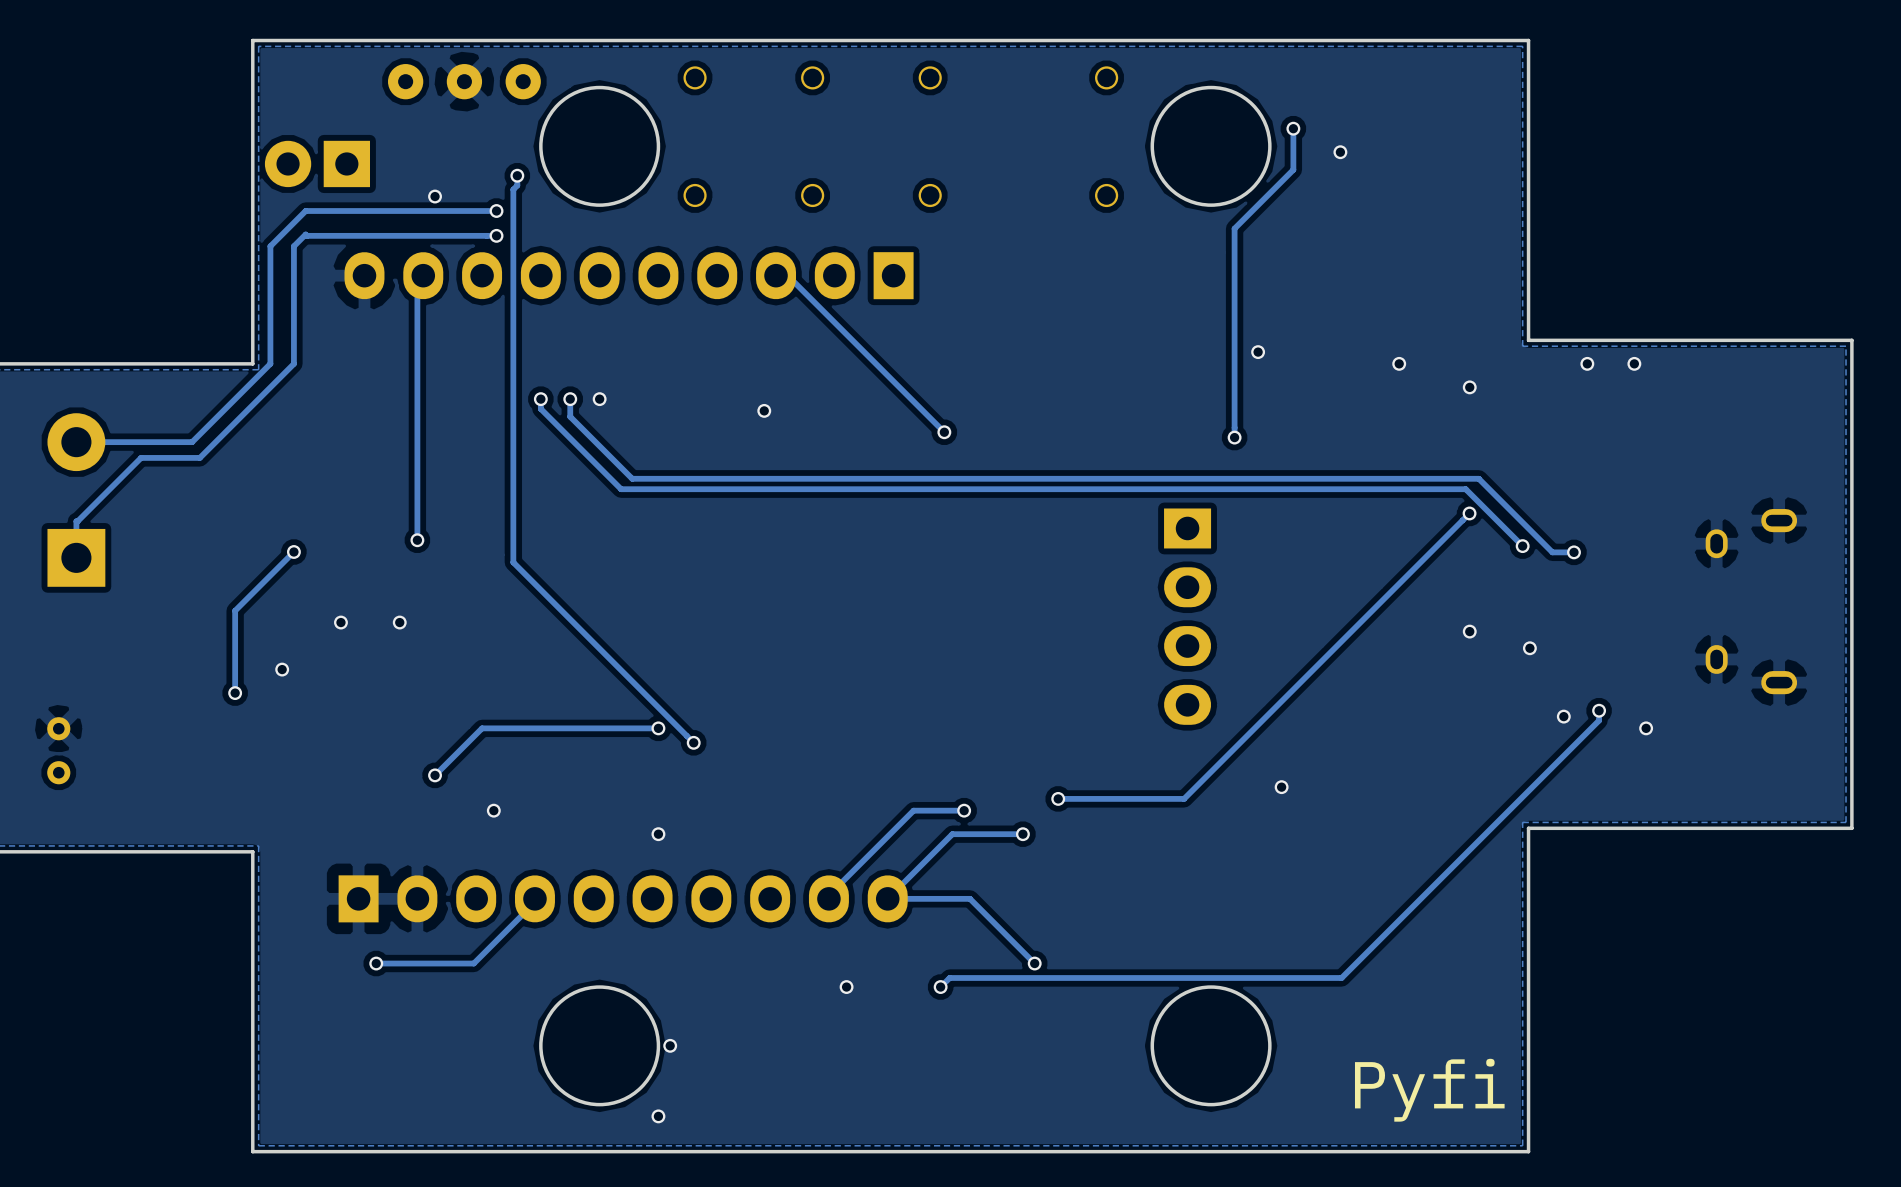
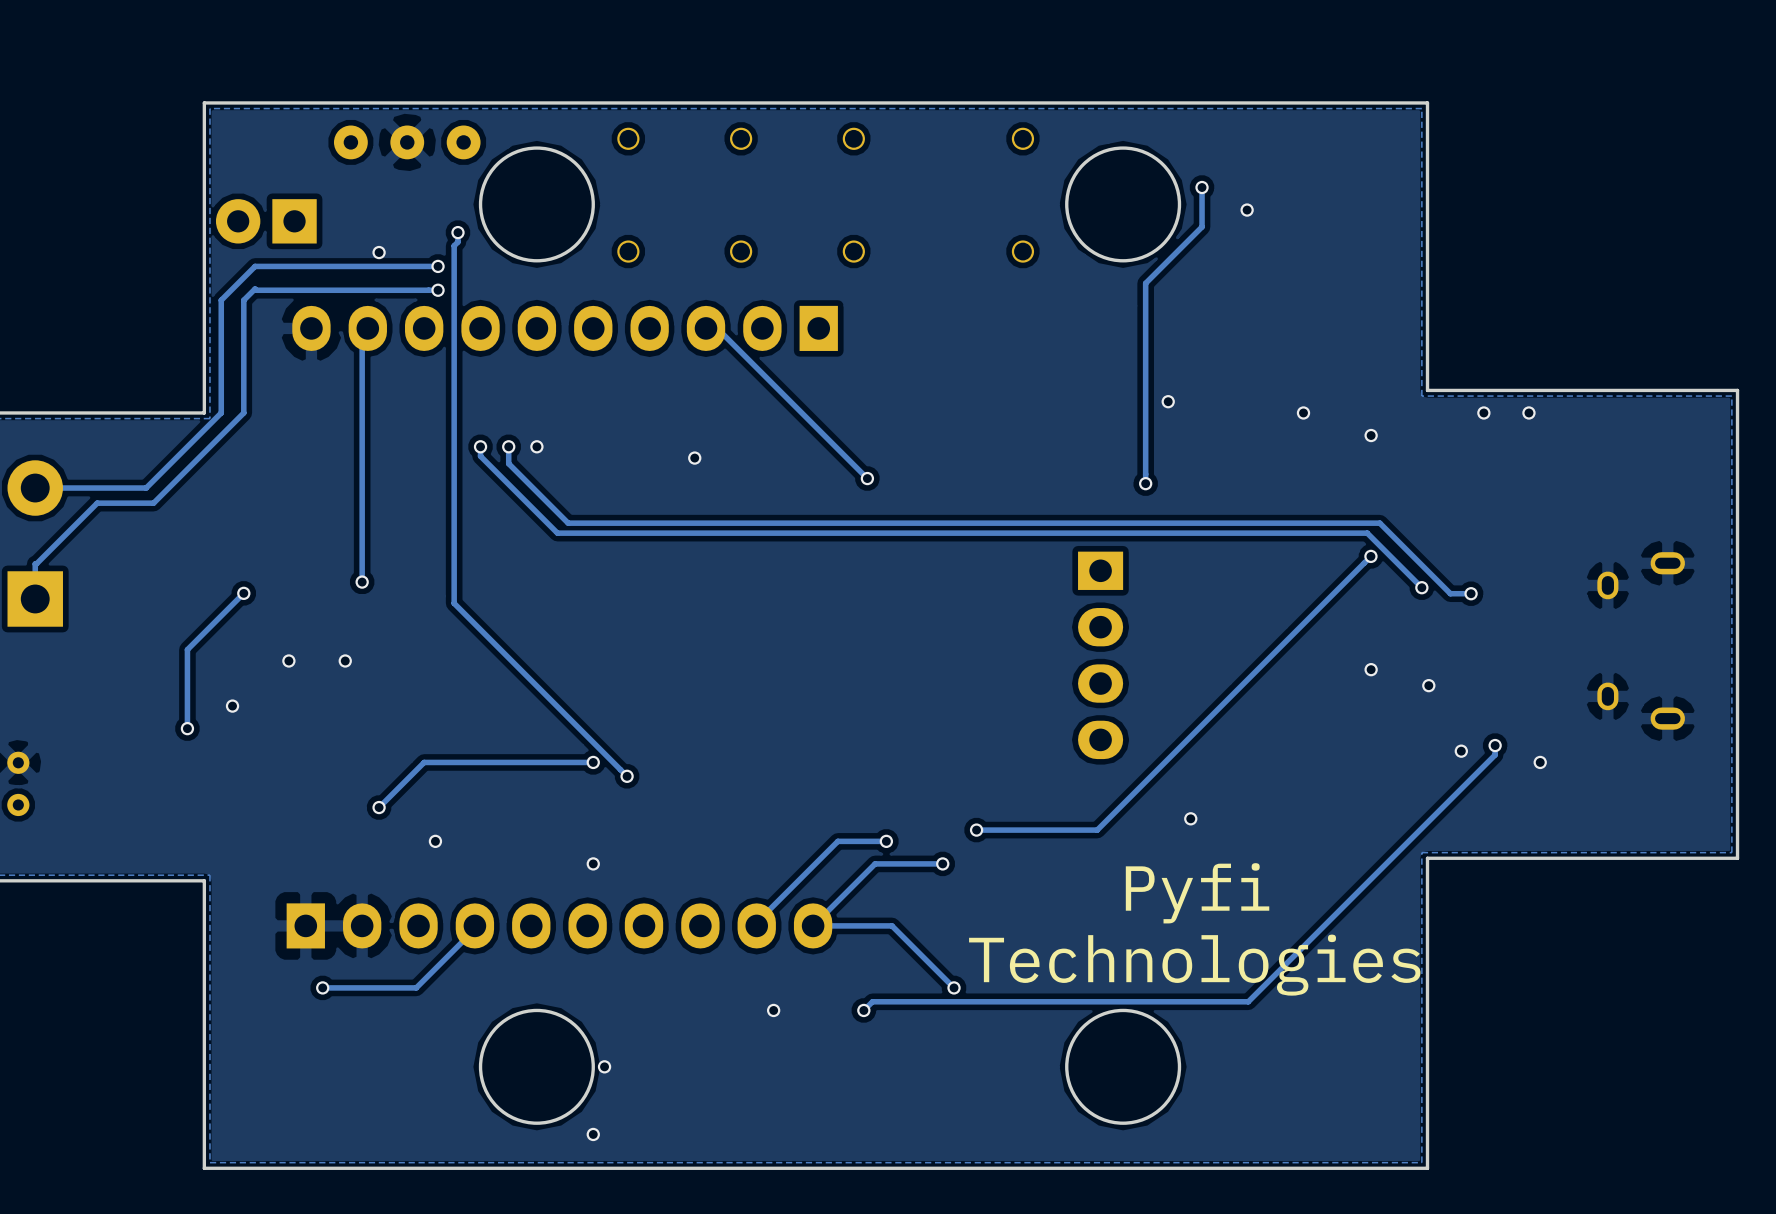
text: none -> Technologies (1194, 965)
text position: Pyfi (1429, 1090) -> Pyfi (1197, 893)

